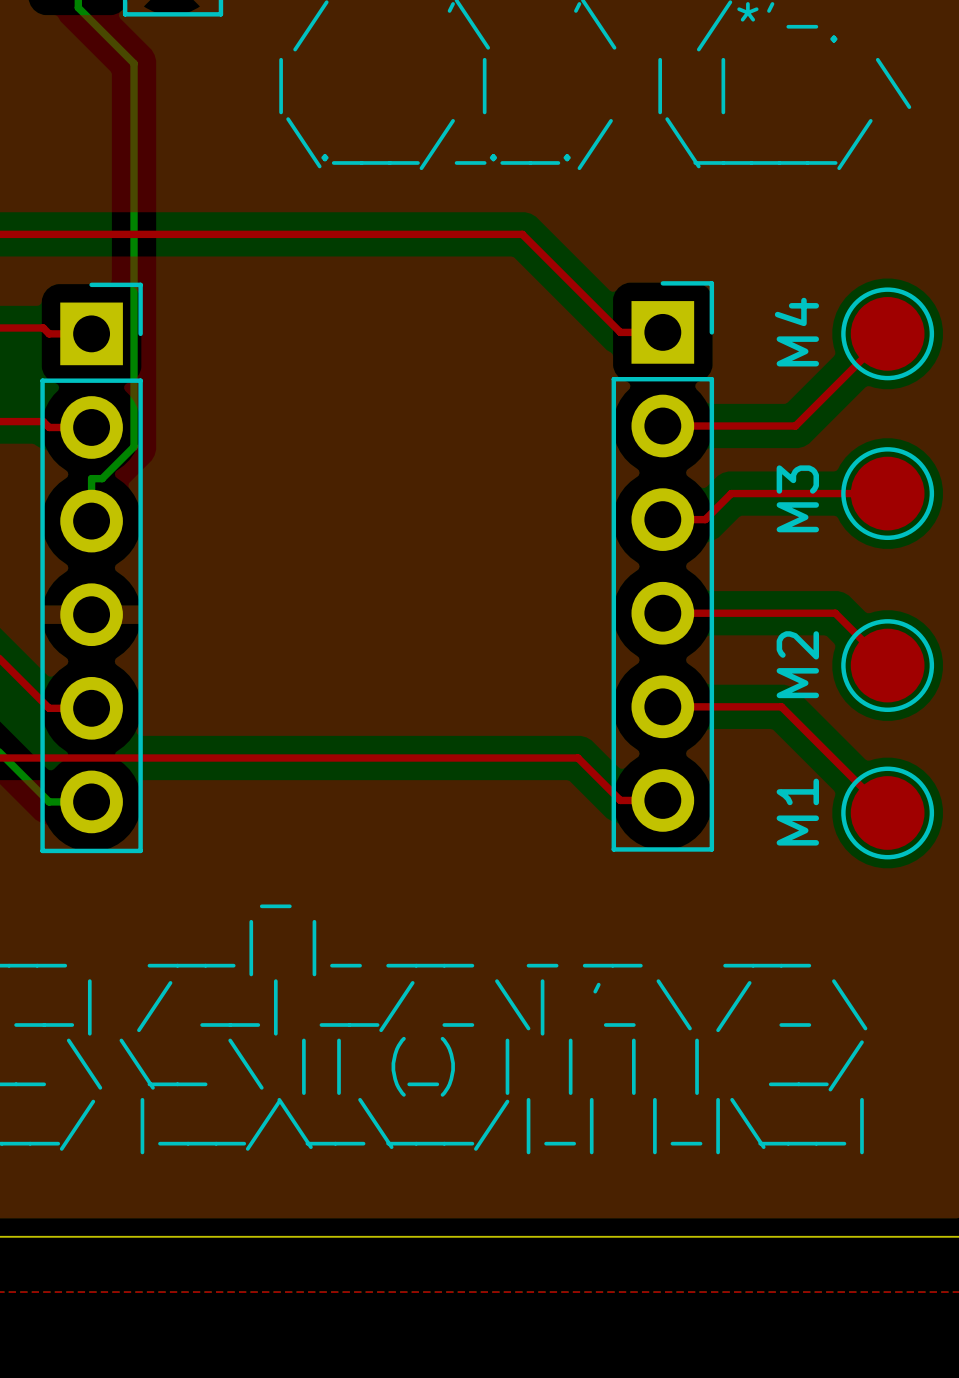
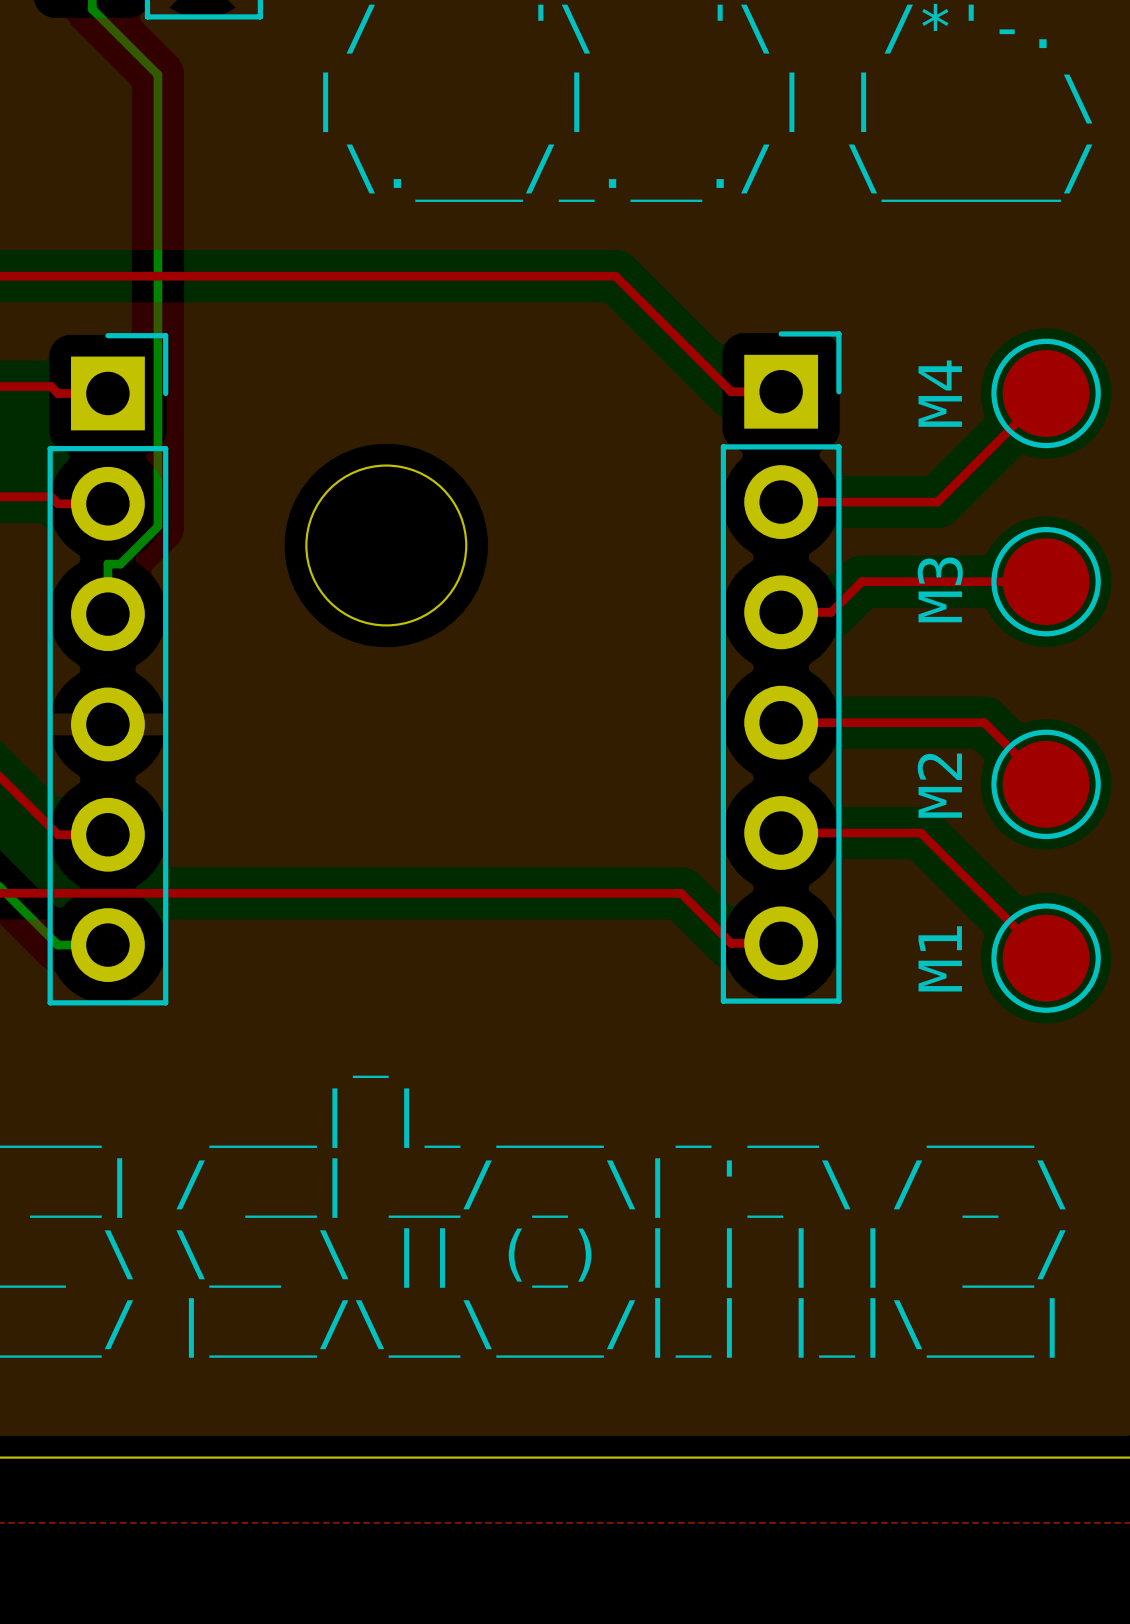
round board edge: none -> [305, 464, 468, 627]

